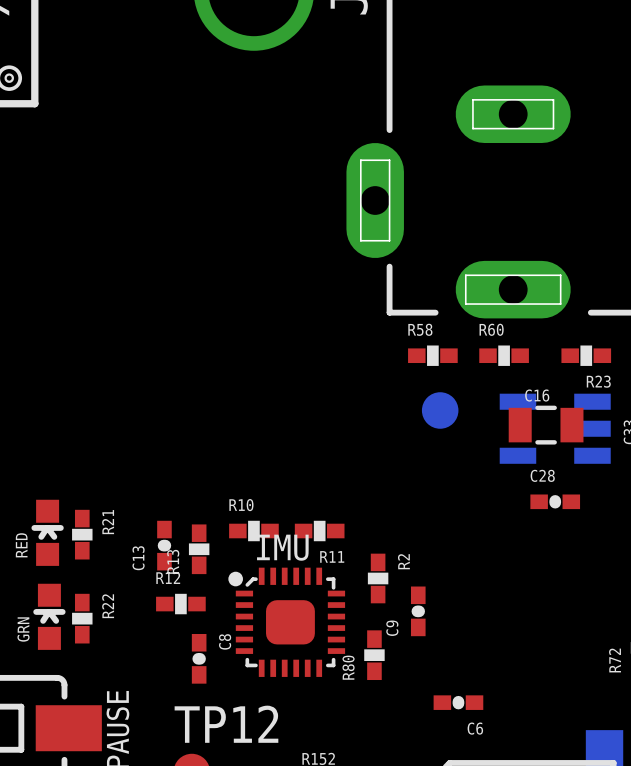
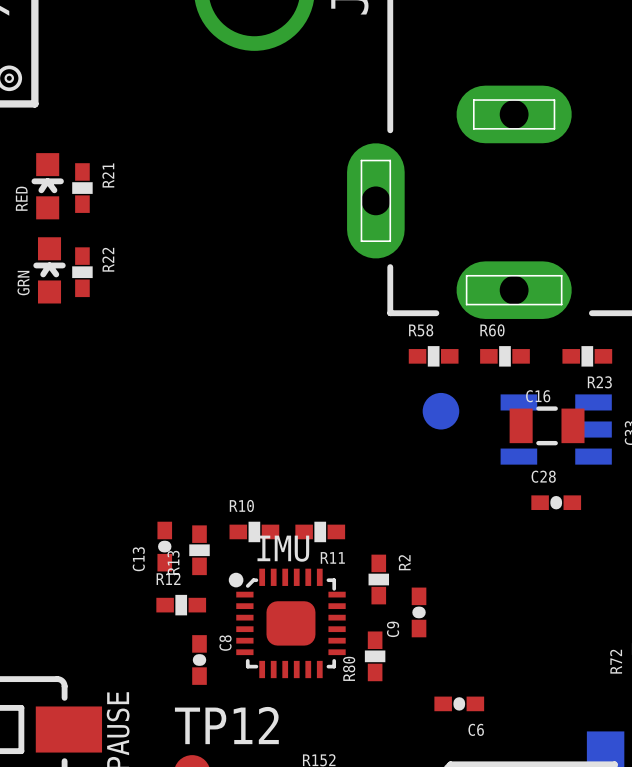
RED position: (47, 532) -> (47, 186)
R21 position: (82, 534) -> (82, 188)
GRN position: (49, 616) -> (49, 270)
R22 position: (82, 618) -> (82, 272)

